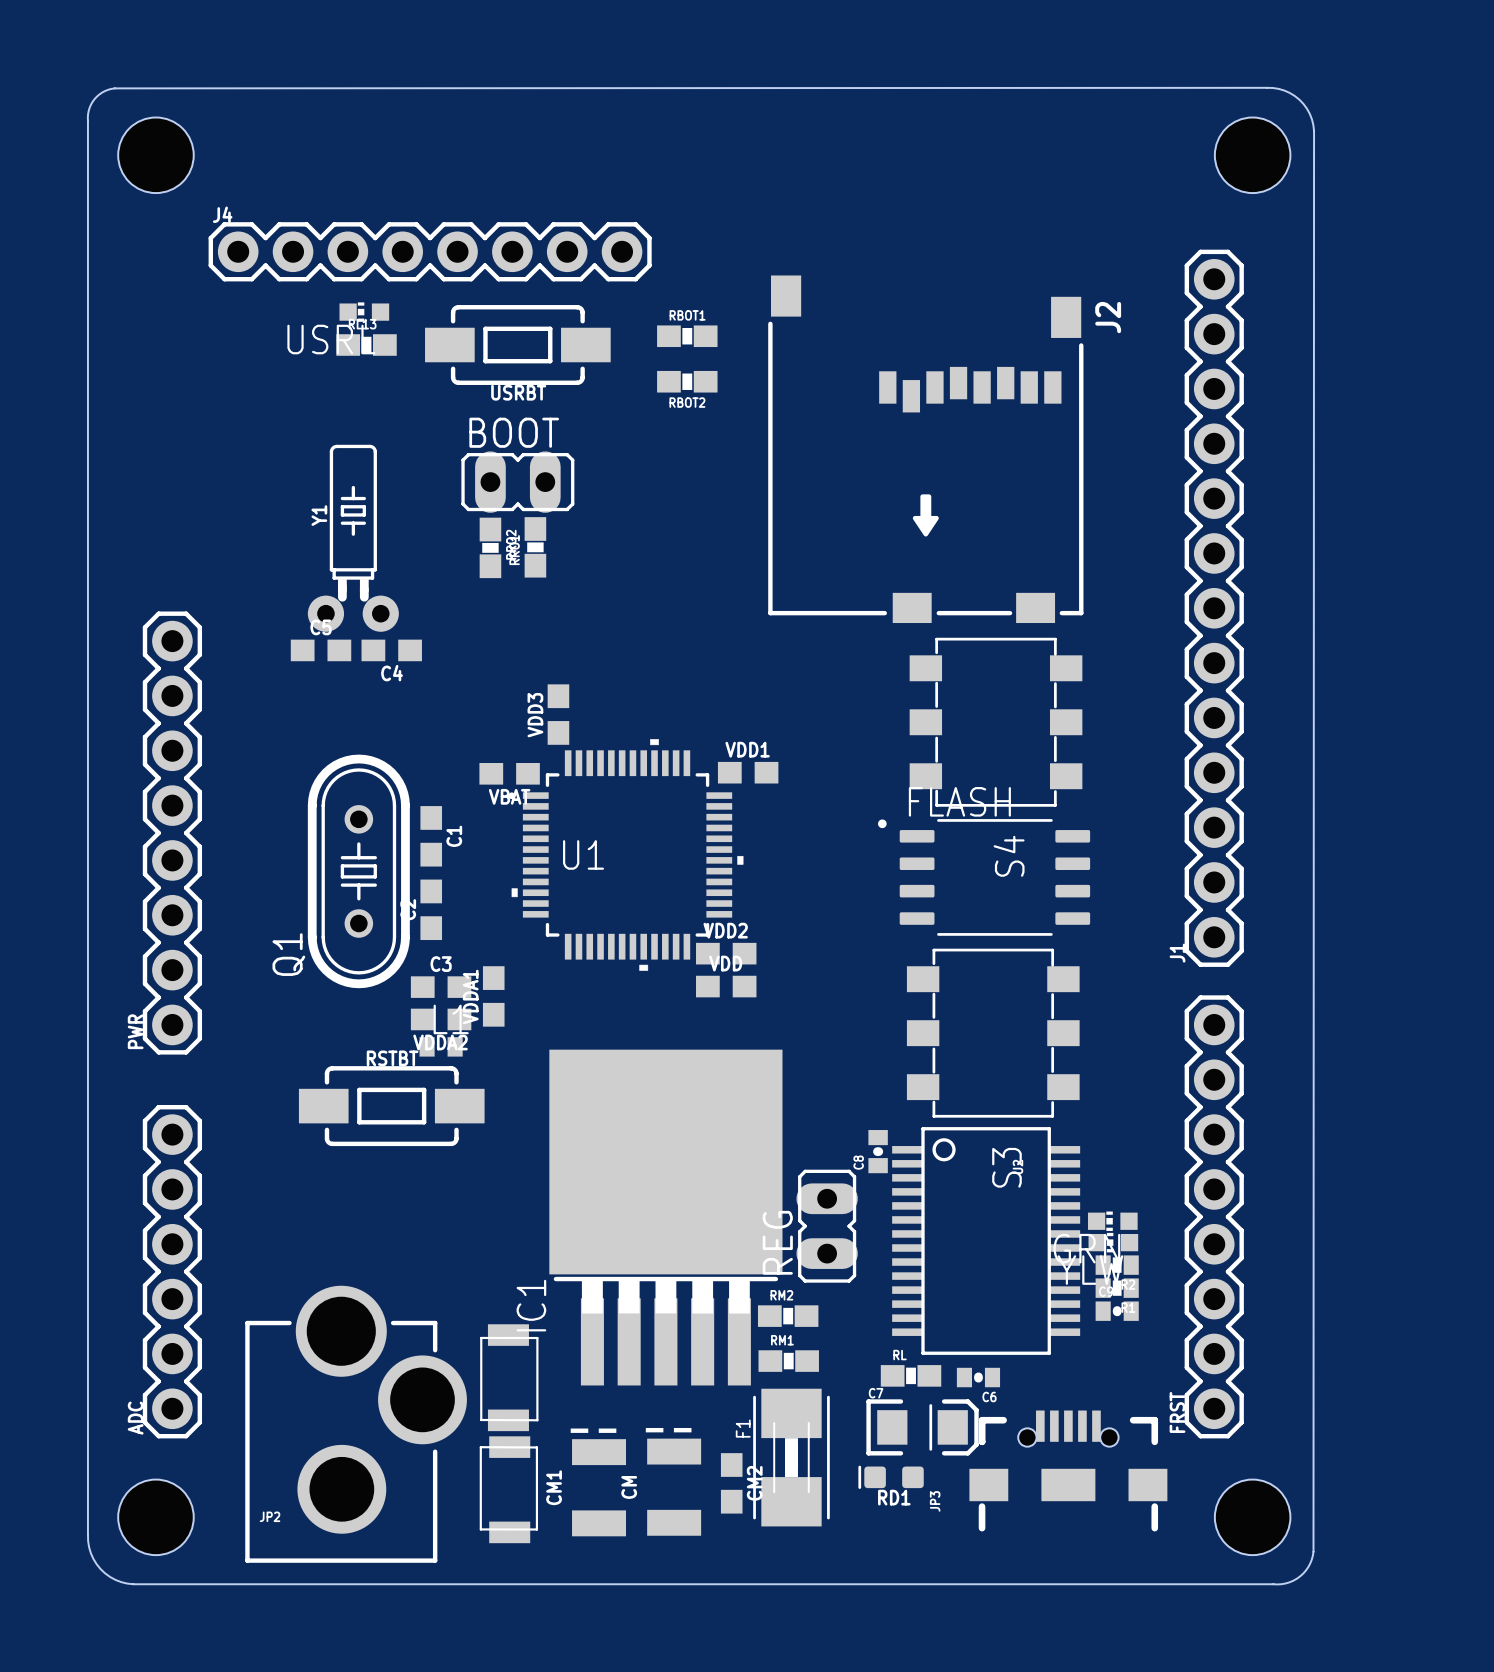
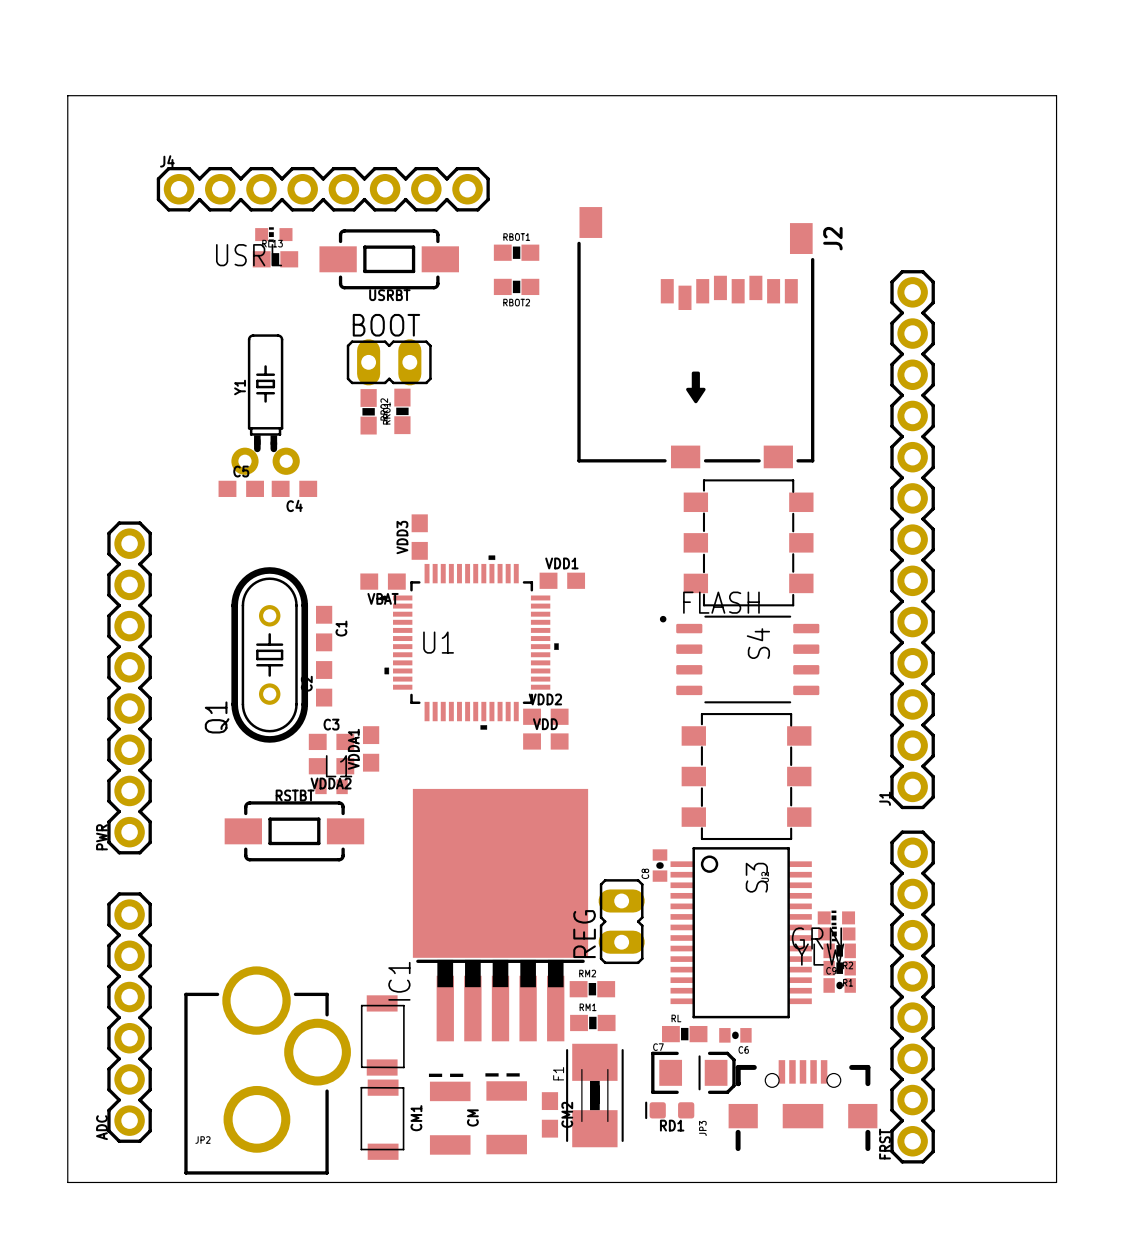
board edge: (1266, 87) (114, 88) (102, 92) (94, 99) (89, 107) (87, 117) (87, 1535) (89, 1547) (93, 1558) (105, 1573) (115, 1579) (133, 1584) (1277, 1584) (1293, 1580) (1305, 1570) (1313, 1551) (1314, 131) (1309, 113) (1299, 99) (1284, 90) (1266, 87) -> (67, 95) (67, 1182) (1056, 1182) (1056, 95) (67, 95)
hole: (155, 155) -> none
hole: (1252, 155) -> none
J1 position: (1214, 608) -> (912, 539)
PWR position: (172, 833) -> (129, 687)
FRST position: (1214, 1216) -> (912, 997)
ADC position: (172, 1271) -> (129, 1017)
hole: (155, 1517) -> none
hole: (1252, 1517) -> none

